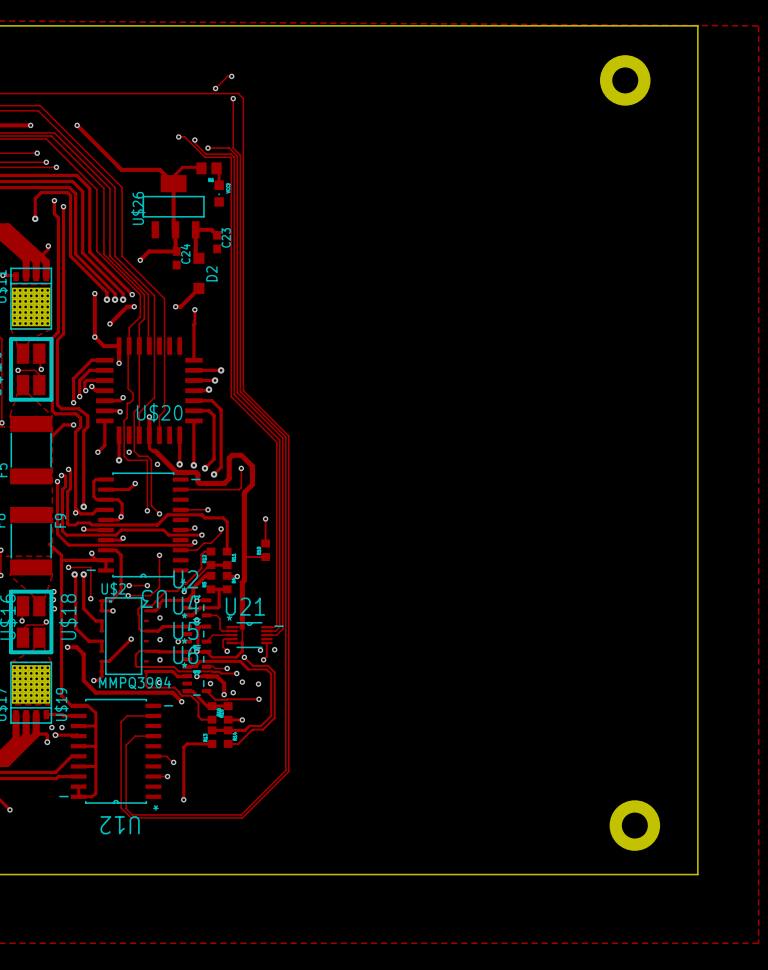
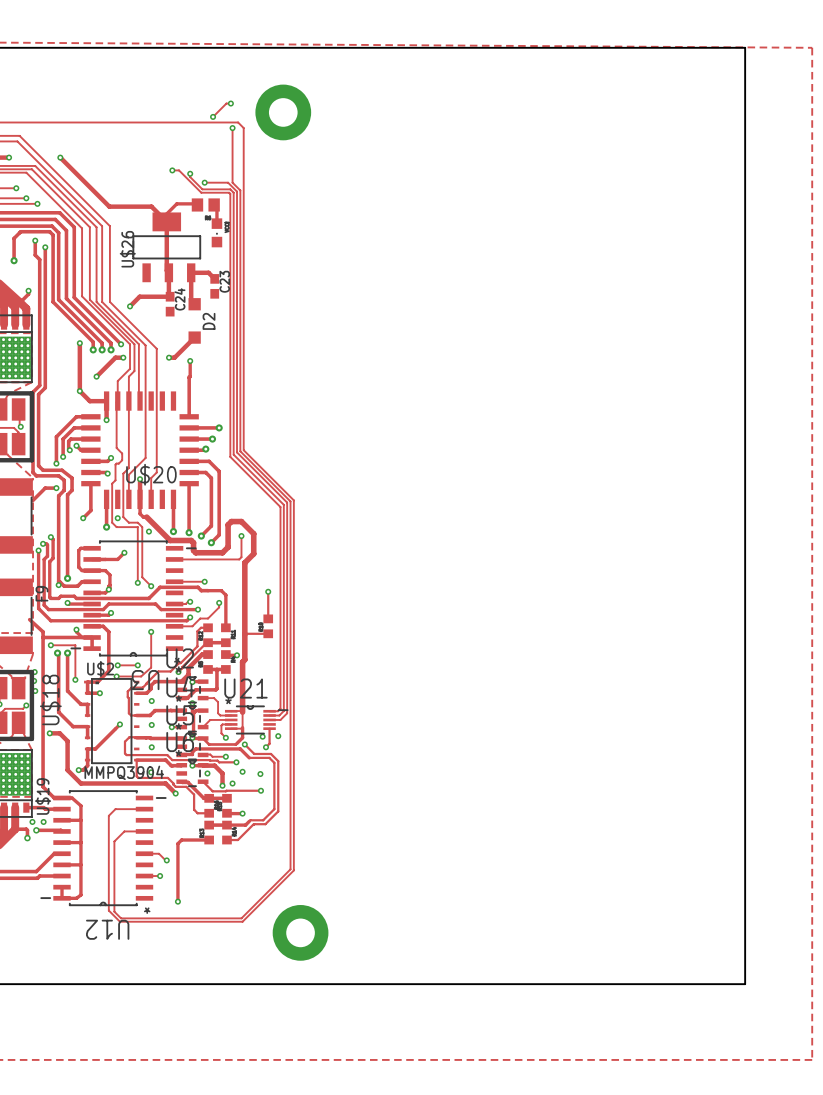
part: (625, 80) -> none
part: none -> (283, 112)
part: (634, 825) -> none
part: none -> (300, 932)

